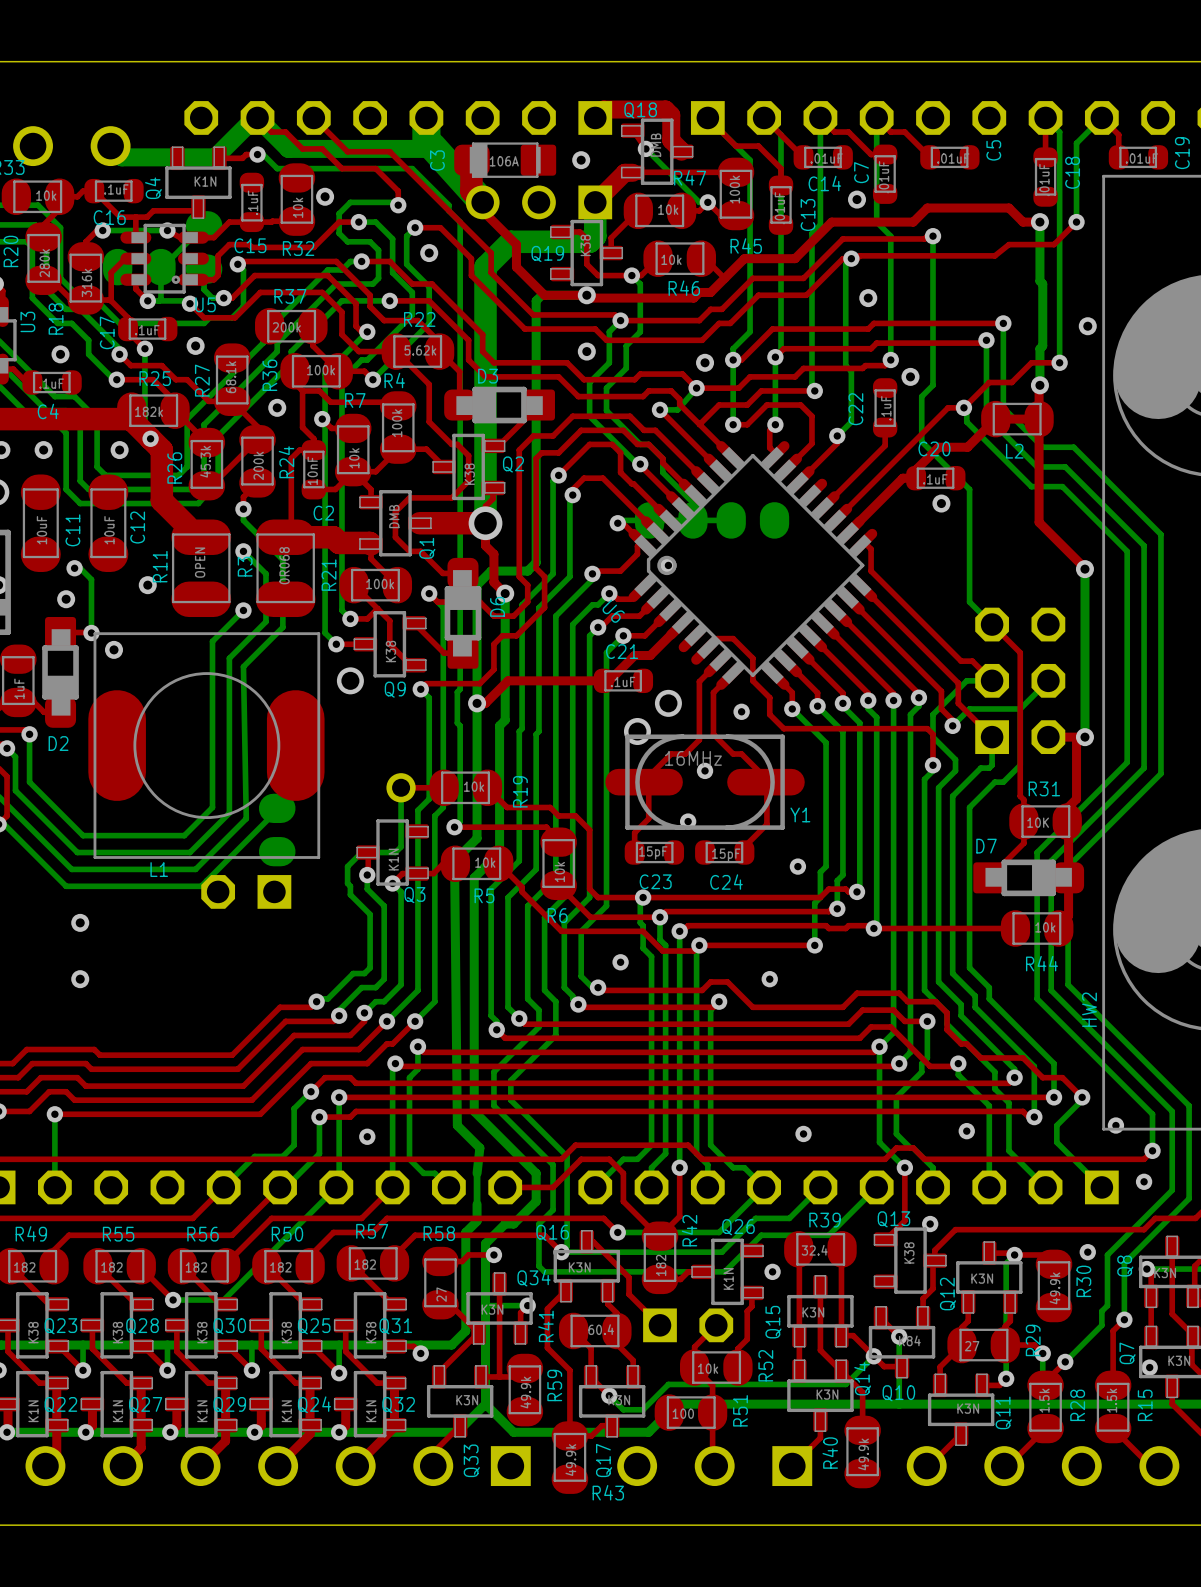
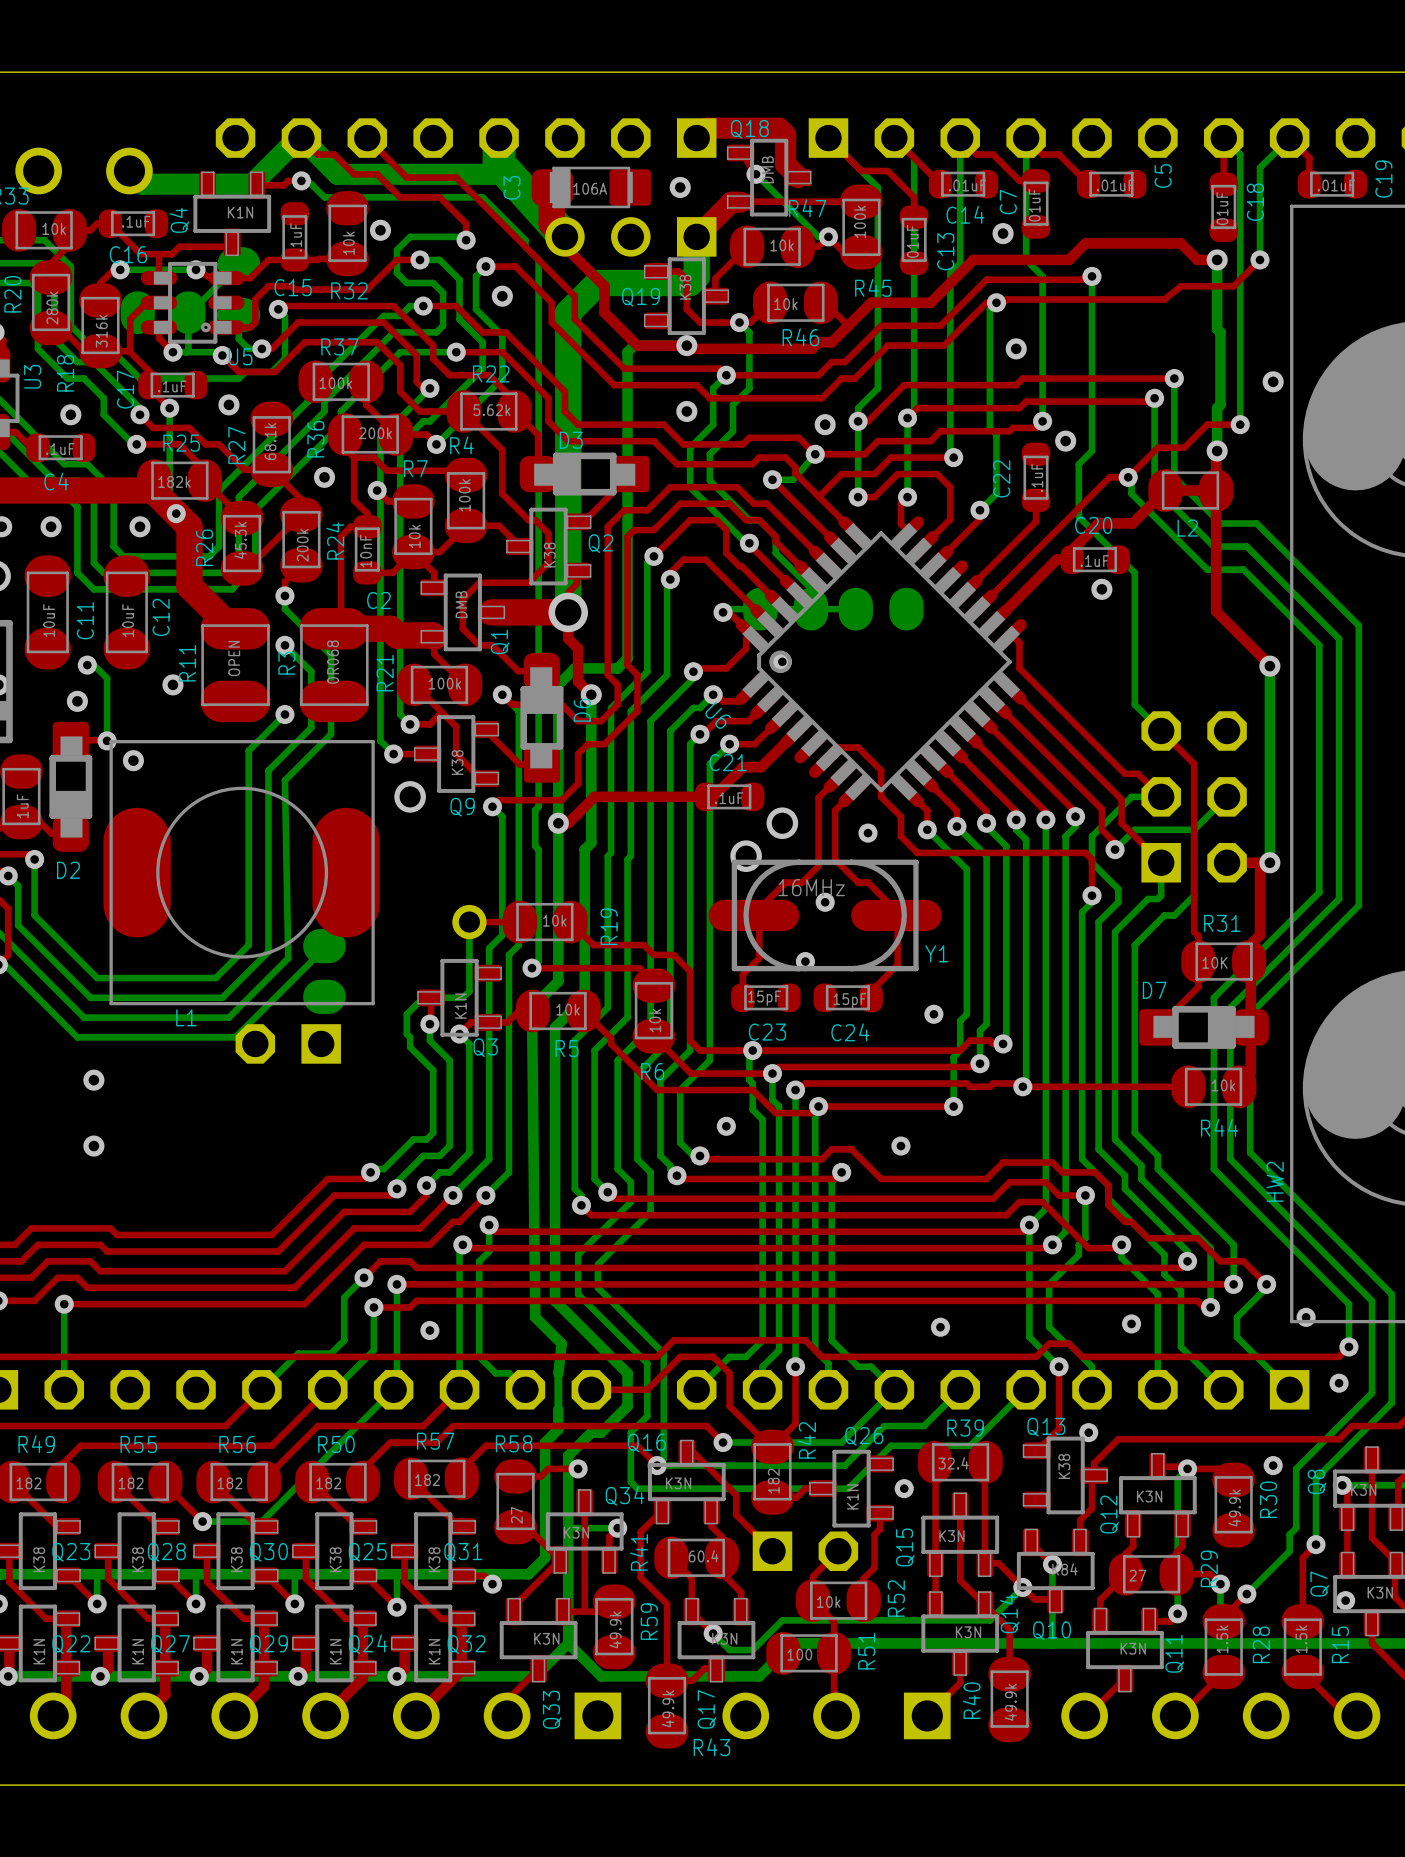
R37 value: 200k (286, 327) -> 100k (335, 383)
R36 value: 100k (321, 370) -> 200k (375, 433)

